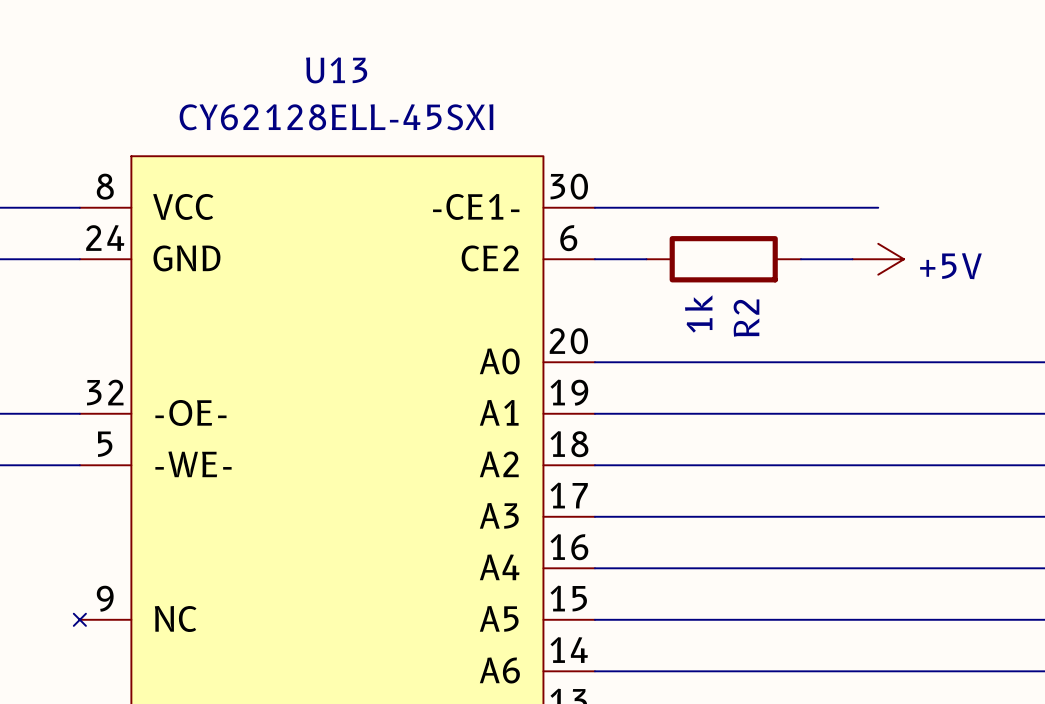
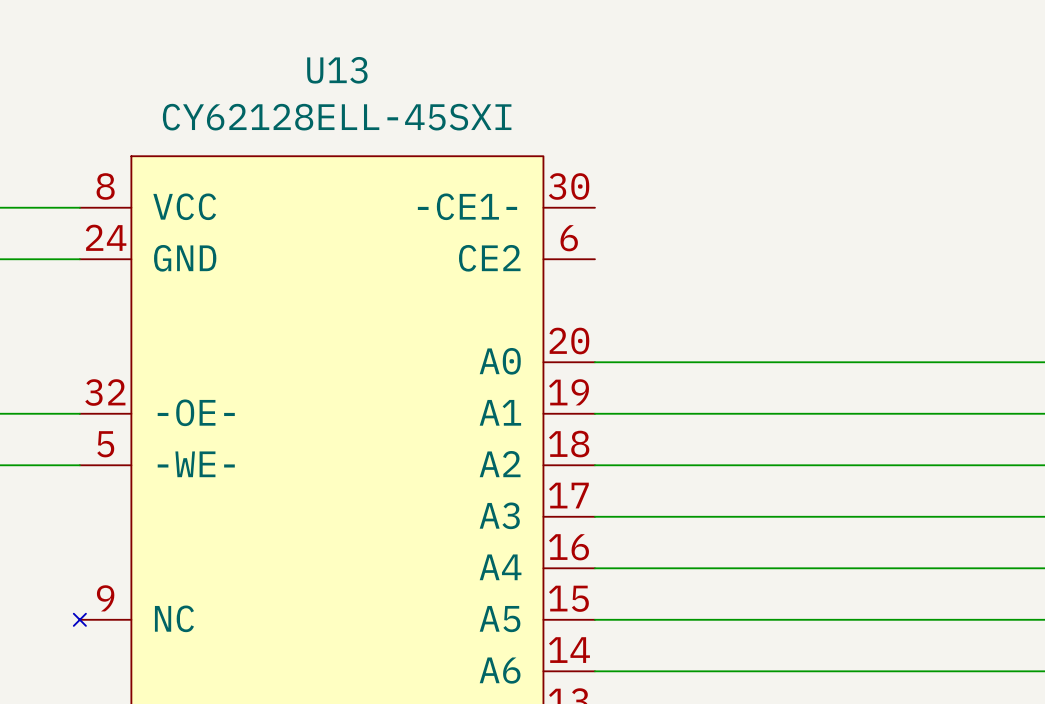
wire: (594, 207) (878, 207) -> none
wire: (594, 259) (646, 259) -> none
R2: 1k (723, 259) -> none
wire: (800, 259) (852, 259) -> none
power symbol: +5V (878, 259) -> none

